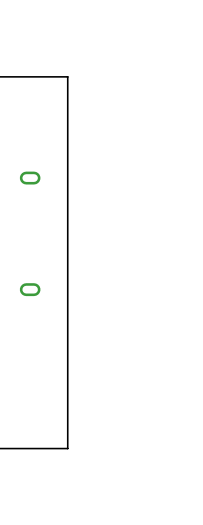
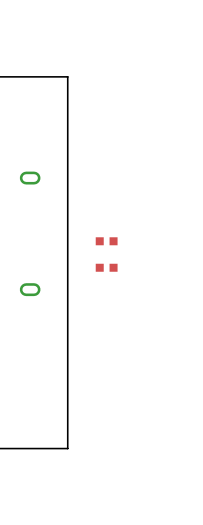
part: none -> (106, 241)
part: none -> (106, 267)

